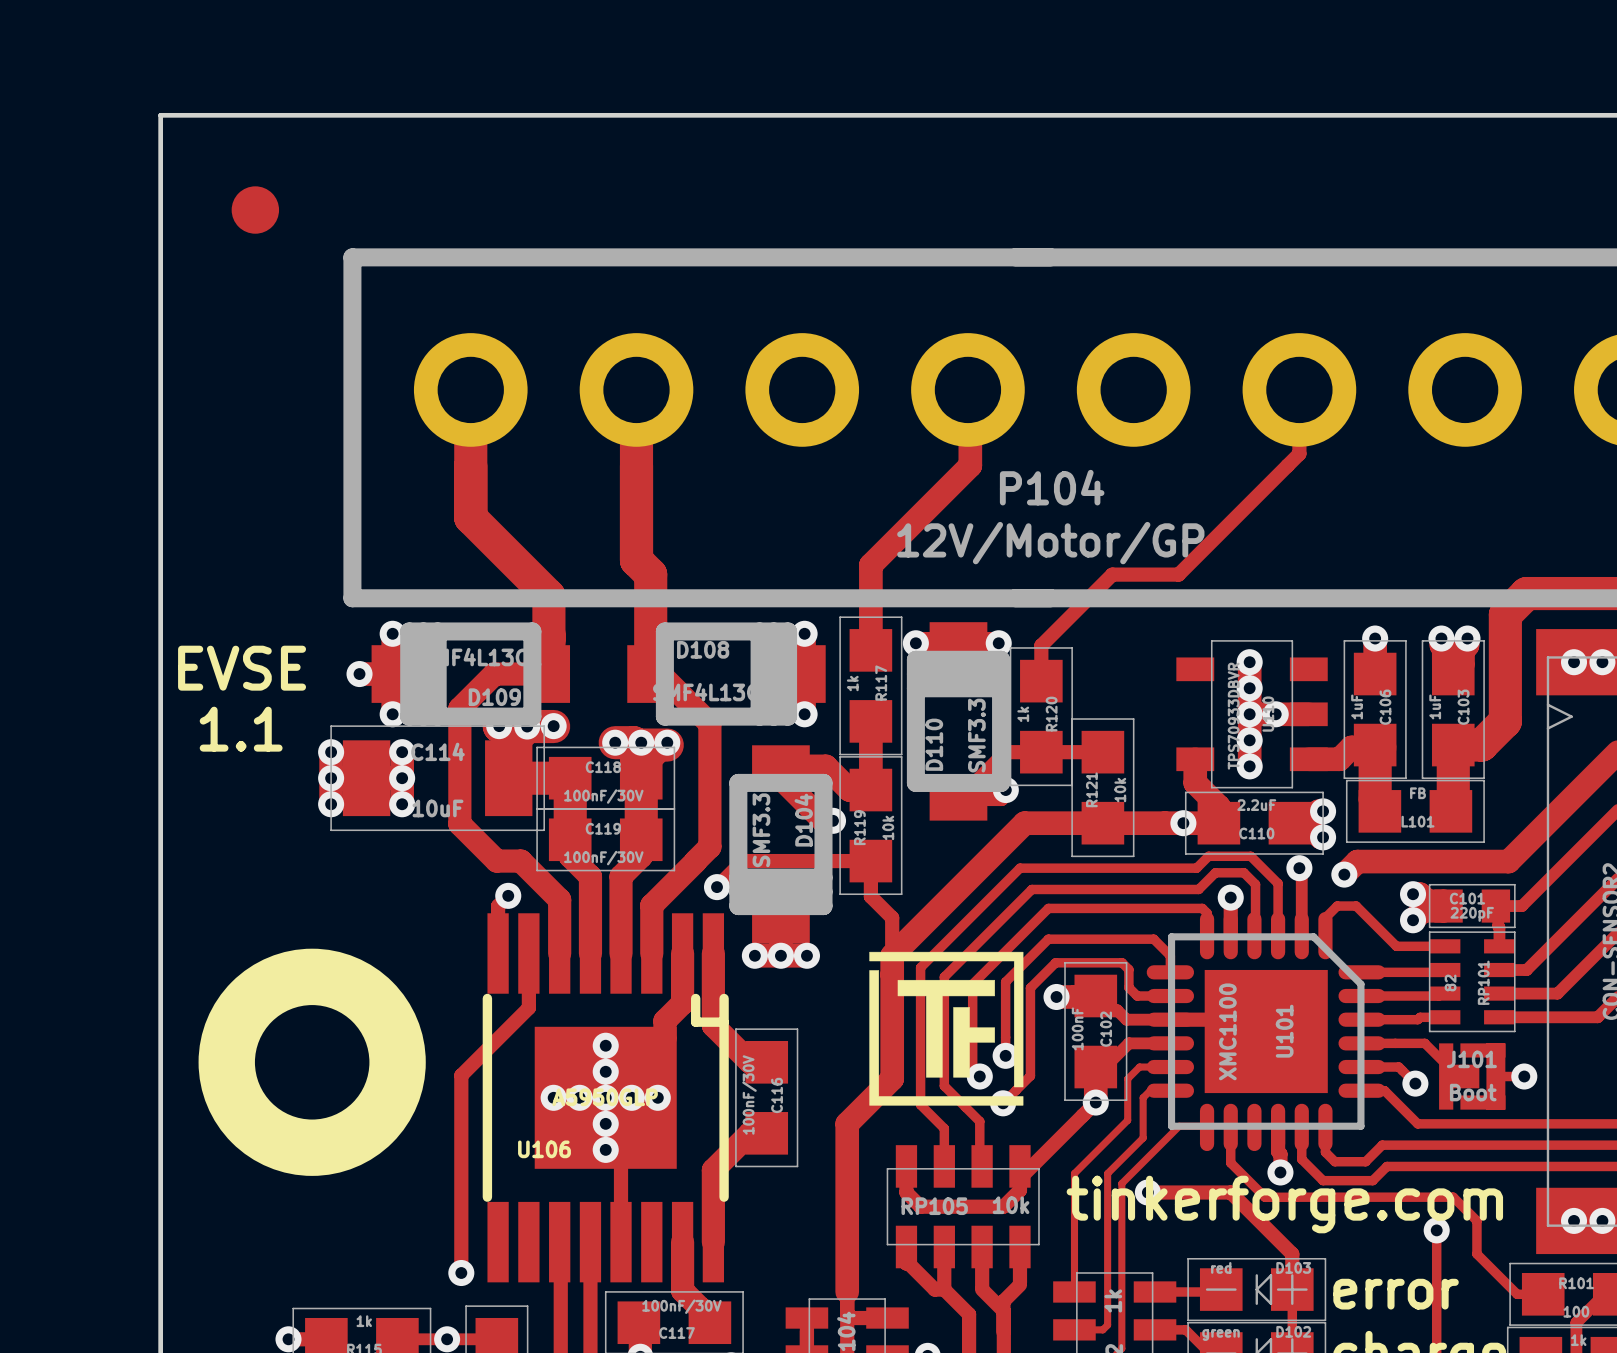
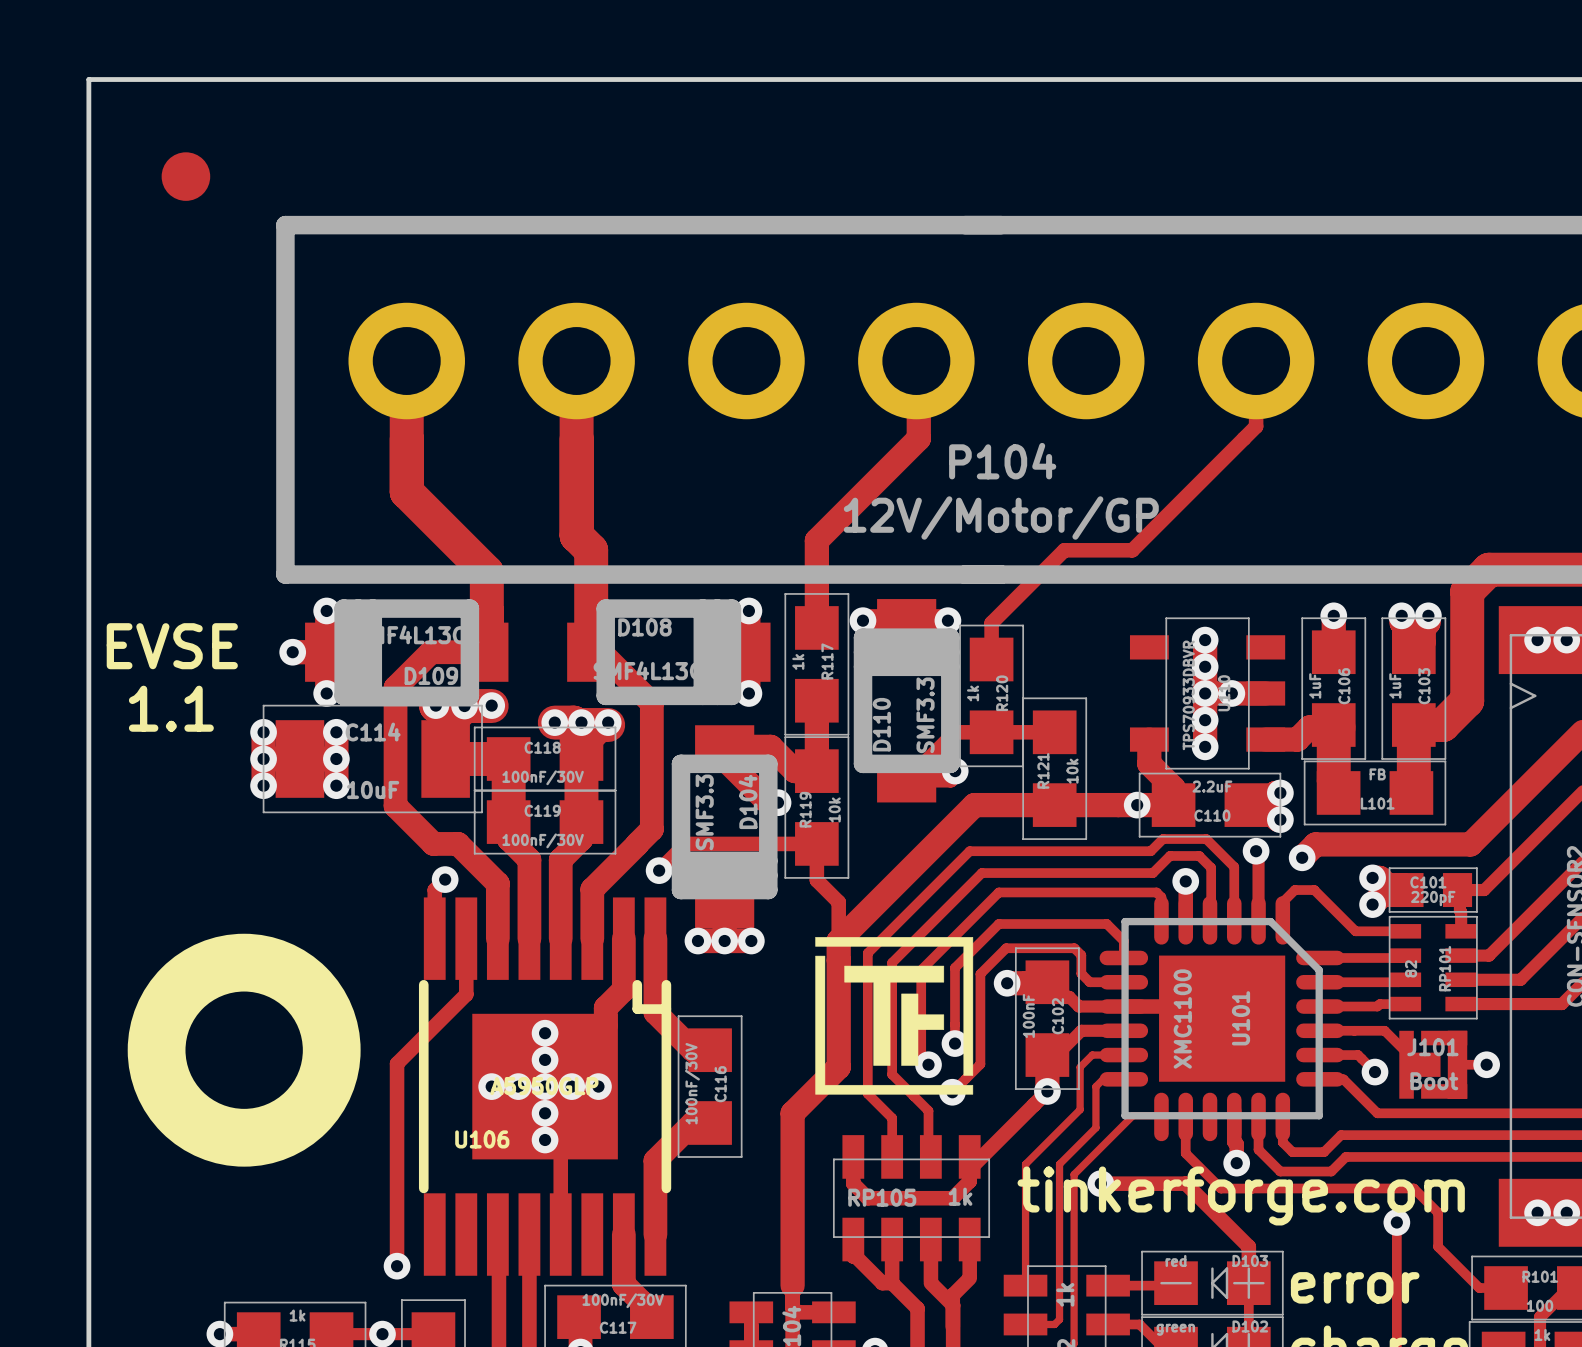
RP105 value: 10k (1011, 1205) -> 1k (960, 1196)

